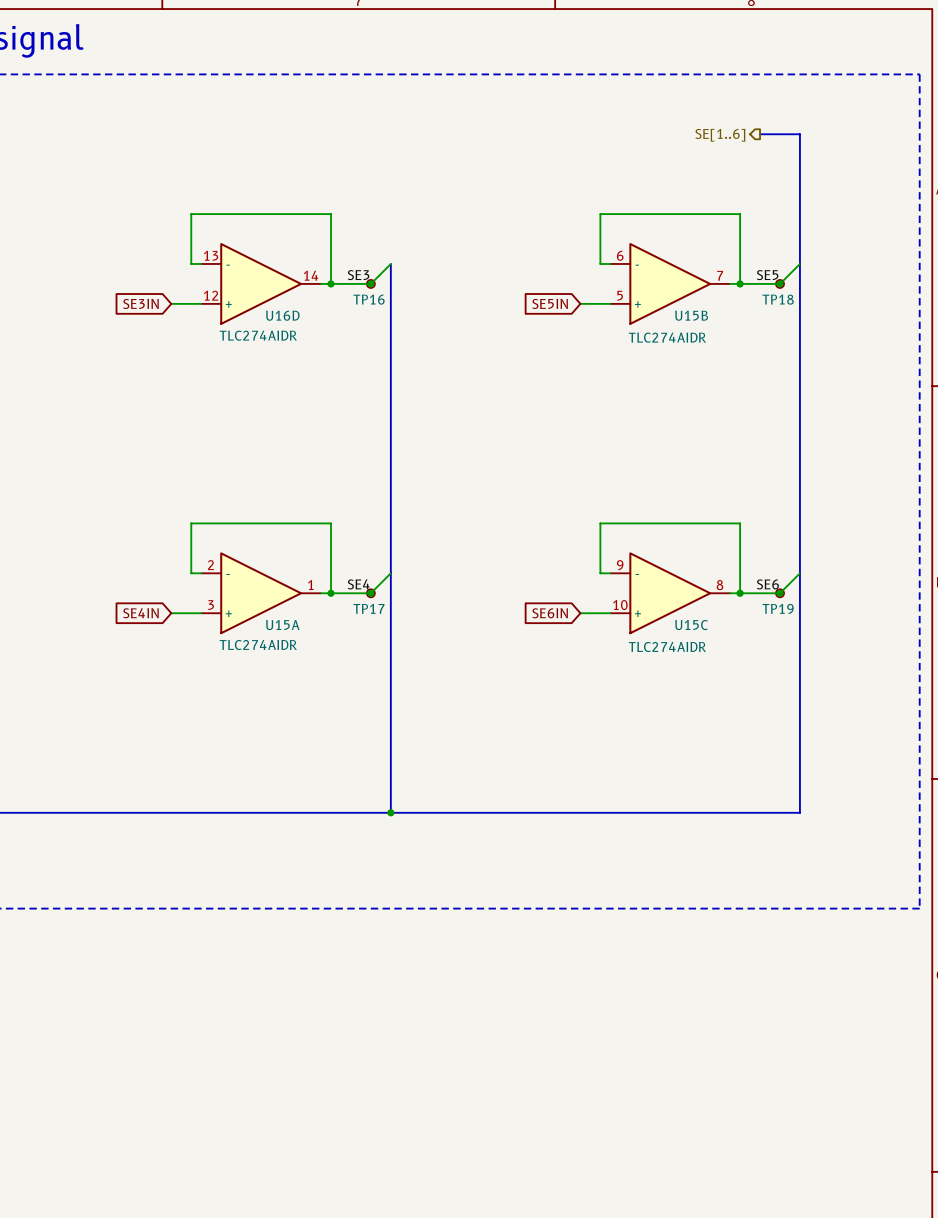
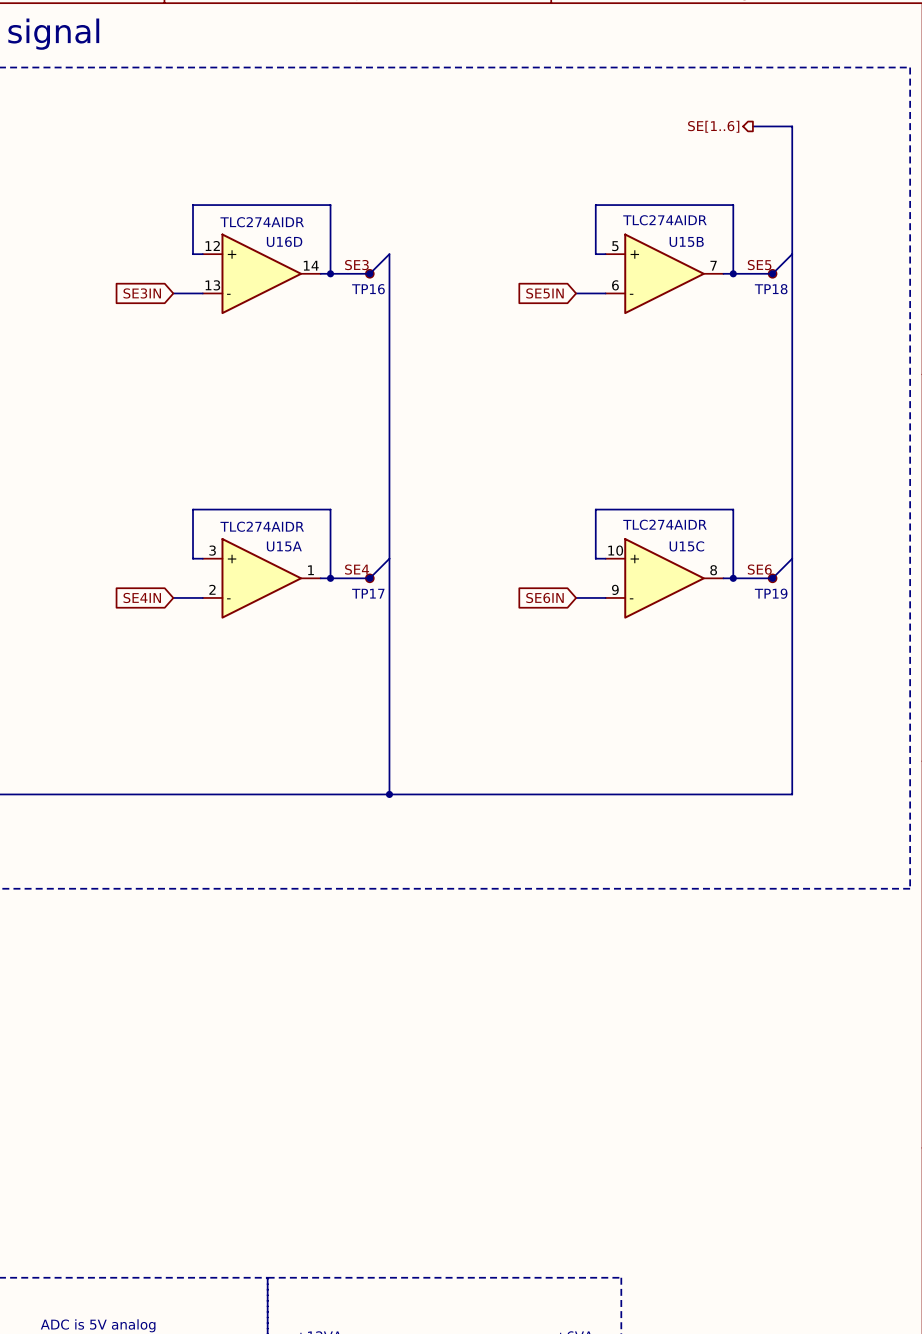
U16D flip: as is (261, 283) -> up-down (261, 273)
U15B flip: as is (670, 283) -> up-down (664, 273)
U15A flip: as is (261, 593) -> up-down (261, 578)
U15C flip: as is (670, 593) -> up-down (664, 578)

